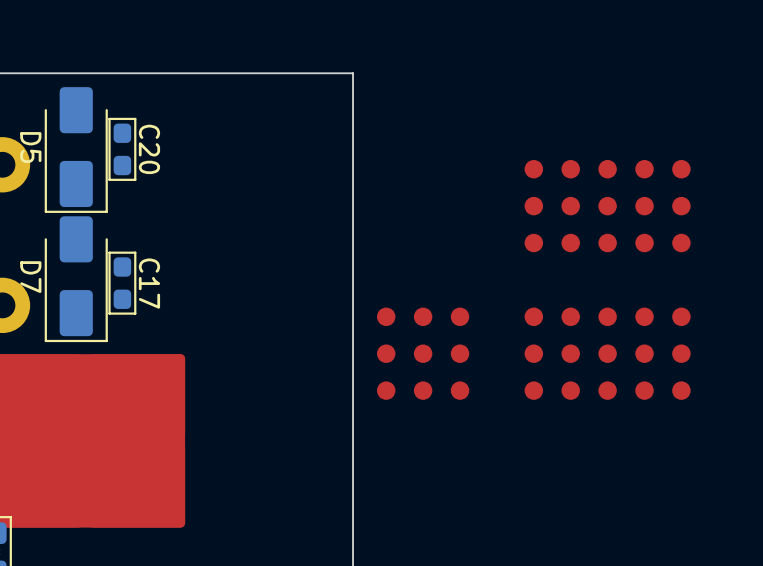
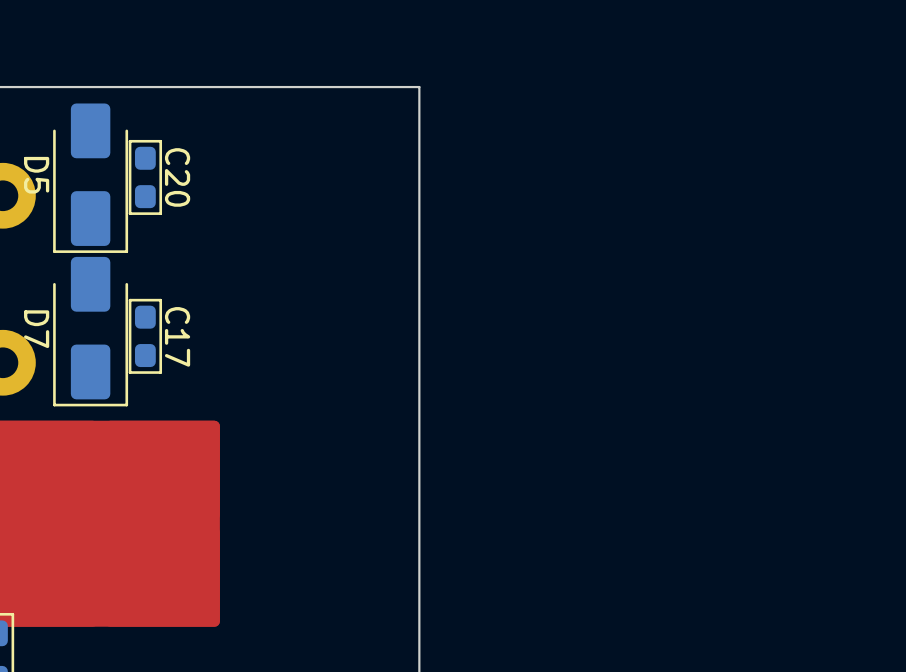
part: (533, 169) -> none
part: (570, 169) -> none
part: (607, 169) -> none
part: (644, 169) -> none
part: (681, 169) -> none
part: (533, 206) -> none
part: (570, 206) -> none
part: (607, 206) -> none
part: (644, 206) -> none
part: (681, 206) -> none
part: (533, 243) -> none
part: (570, 243) -> none
part: (607, 243) -> none
part: (644, 243) -> none
part: (681, 243) -> none
part: (386, 316) -> none
part: (423, 316) -> none
part: (460, 316) -> none
part: (533, 316) -> none
part: (570, 316) -> none
part: (607, 316) -> none
part: (644, 316) -> none
part: (681, 316) -> none
part: (386, 353) -> none
part: (423, 353) -> none
part: (460, 353) -> none
part: (533, 353) -> none
part: (570, 353) -> none
part: (607, 353) -> none
part: (644, 353) -> none
part: (681, 353) -> none
part: (386, 390) -> none
part: (423, 390) -> none
part: (460, 390) -> none
part: (533, 390) -> none
part: (570, 390) -> none
part: (607, 390) -> none
part: (644, 390) -> none
part: (681, 390) -> none

